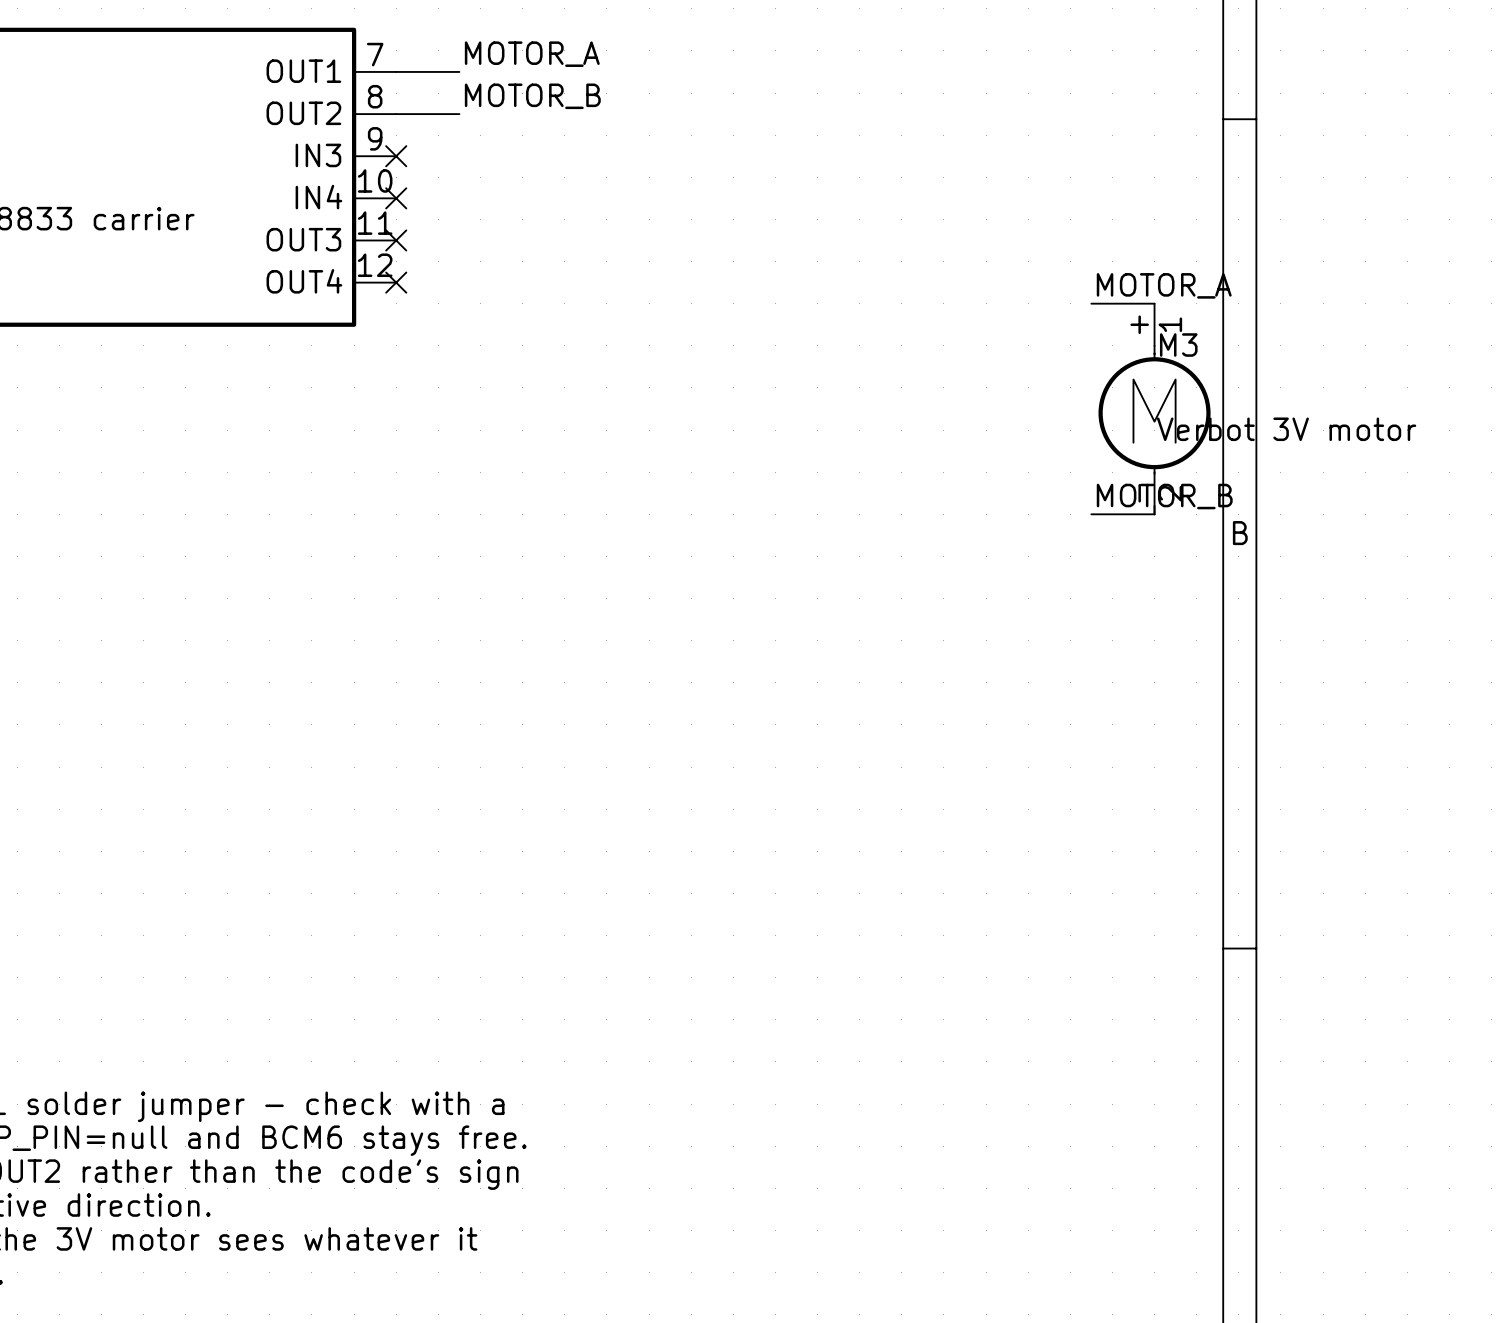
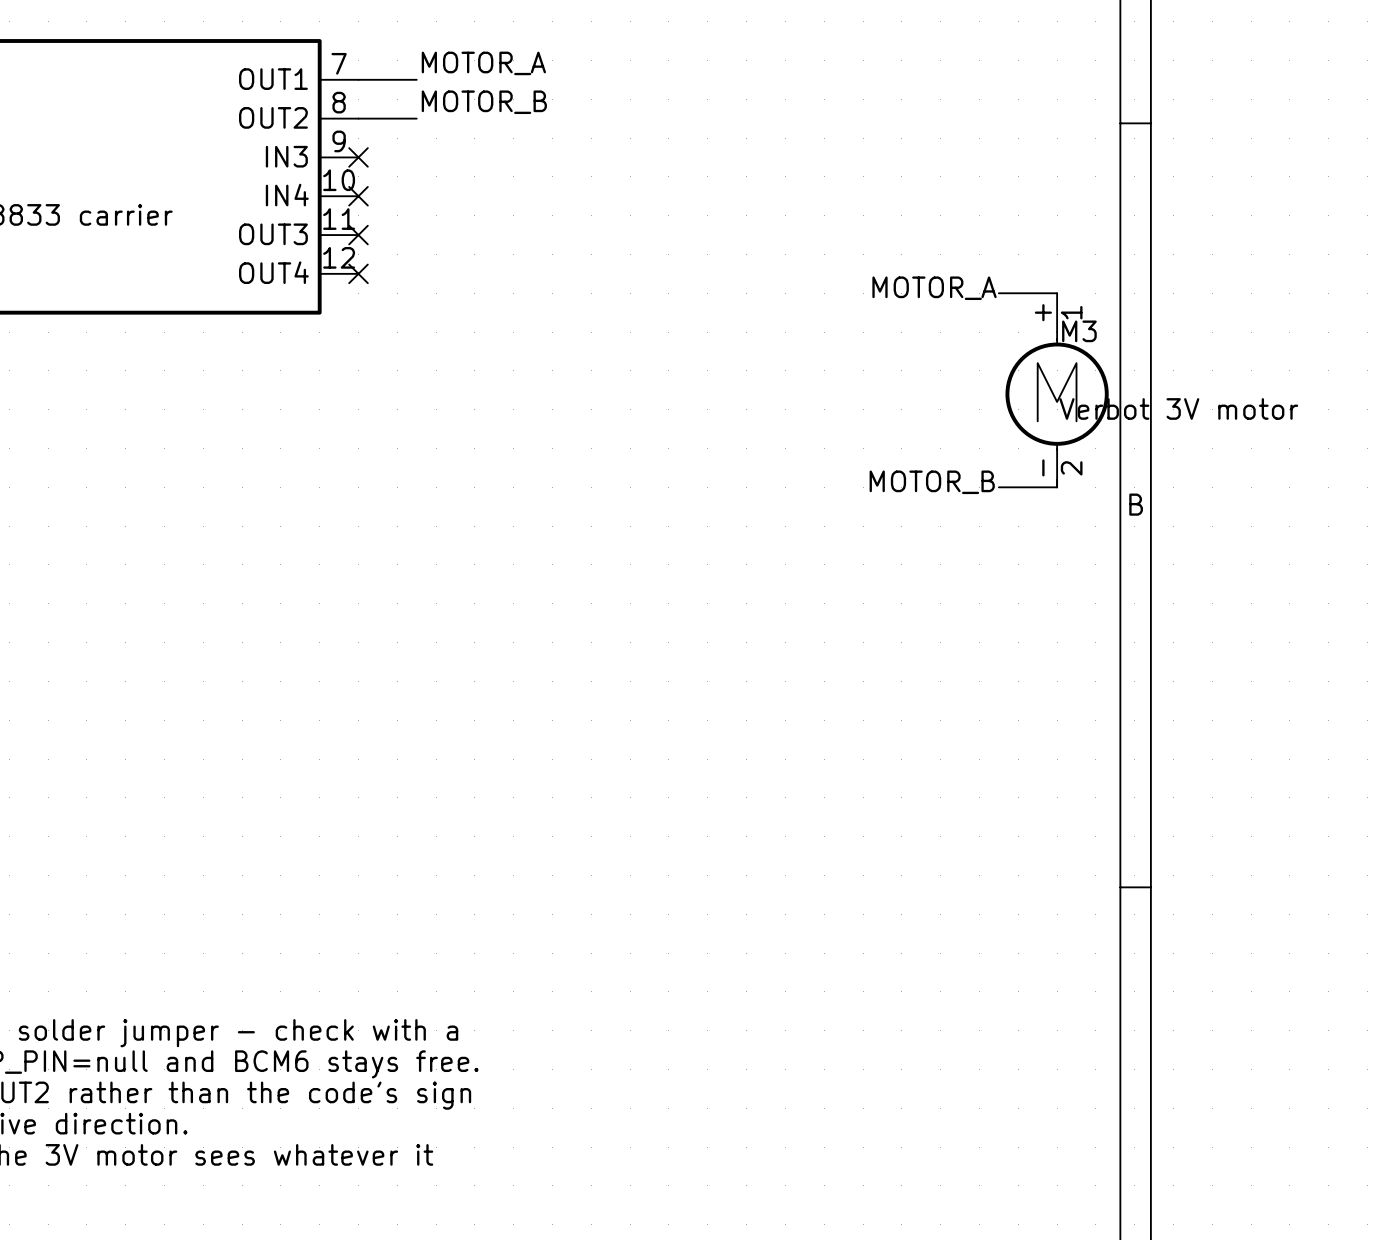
label position: MOTOR_A (1164, 285) -> MOTOR_A (934, 288)
label position: MOTOR_B (1164, 496) -> MOTOR_B (932, 482)

